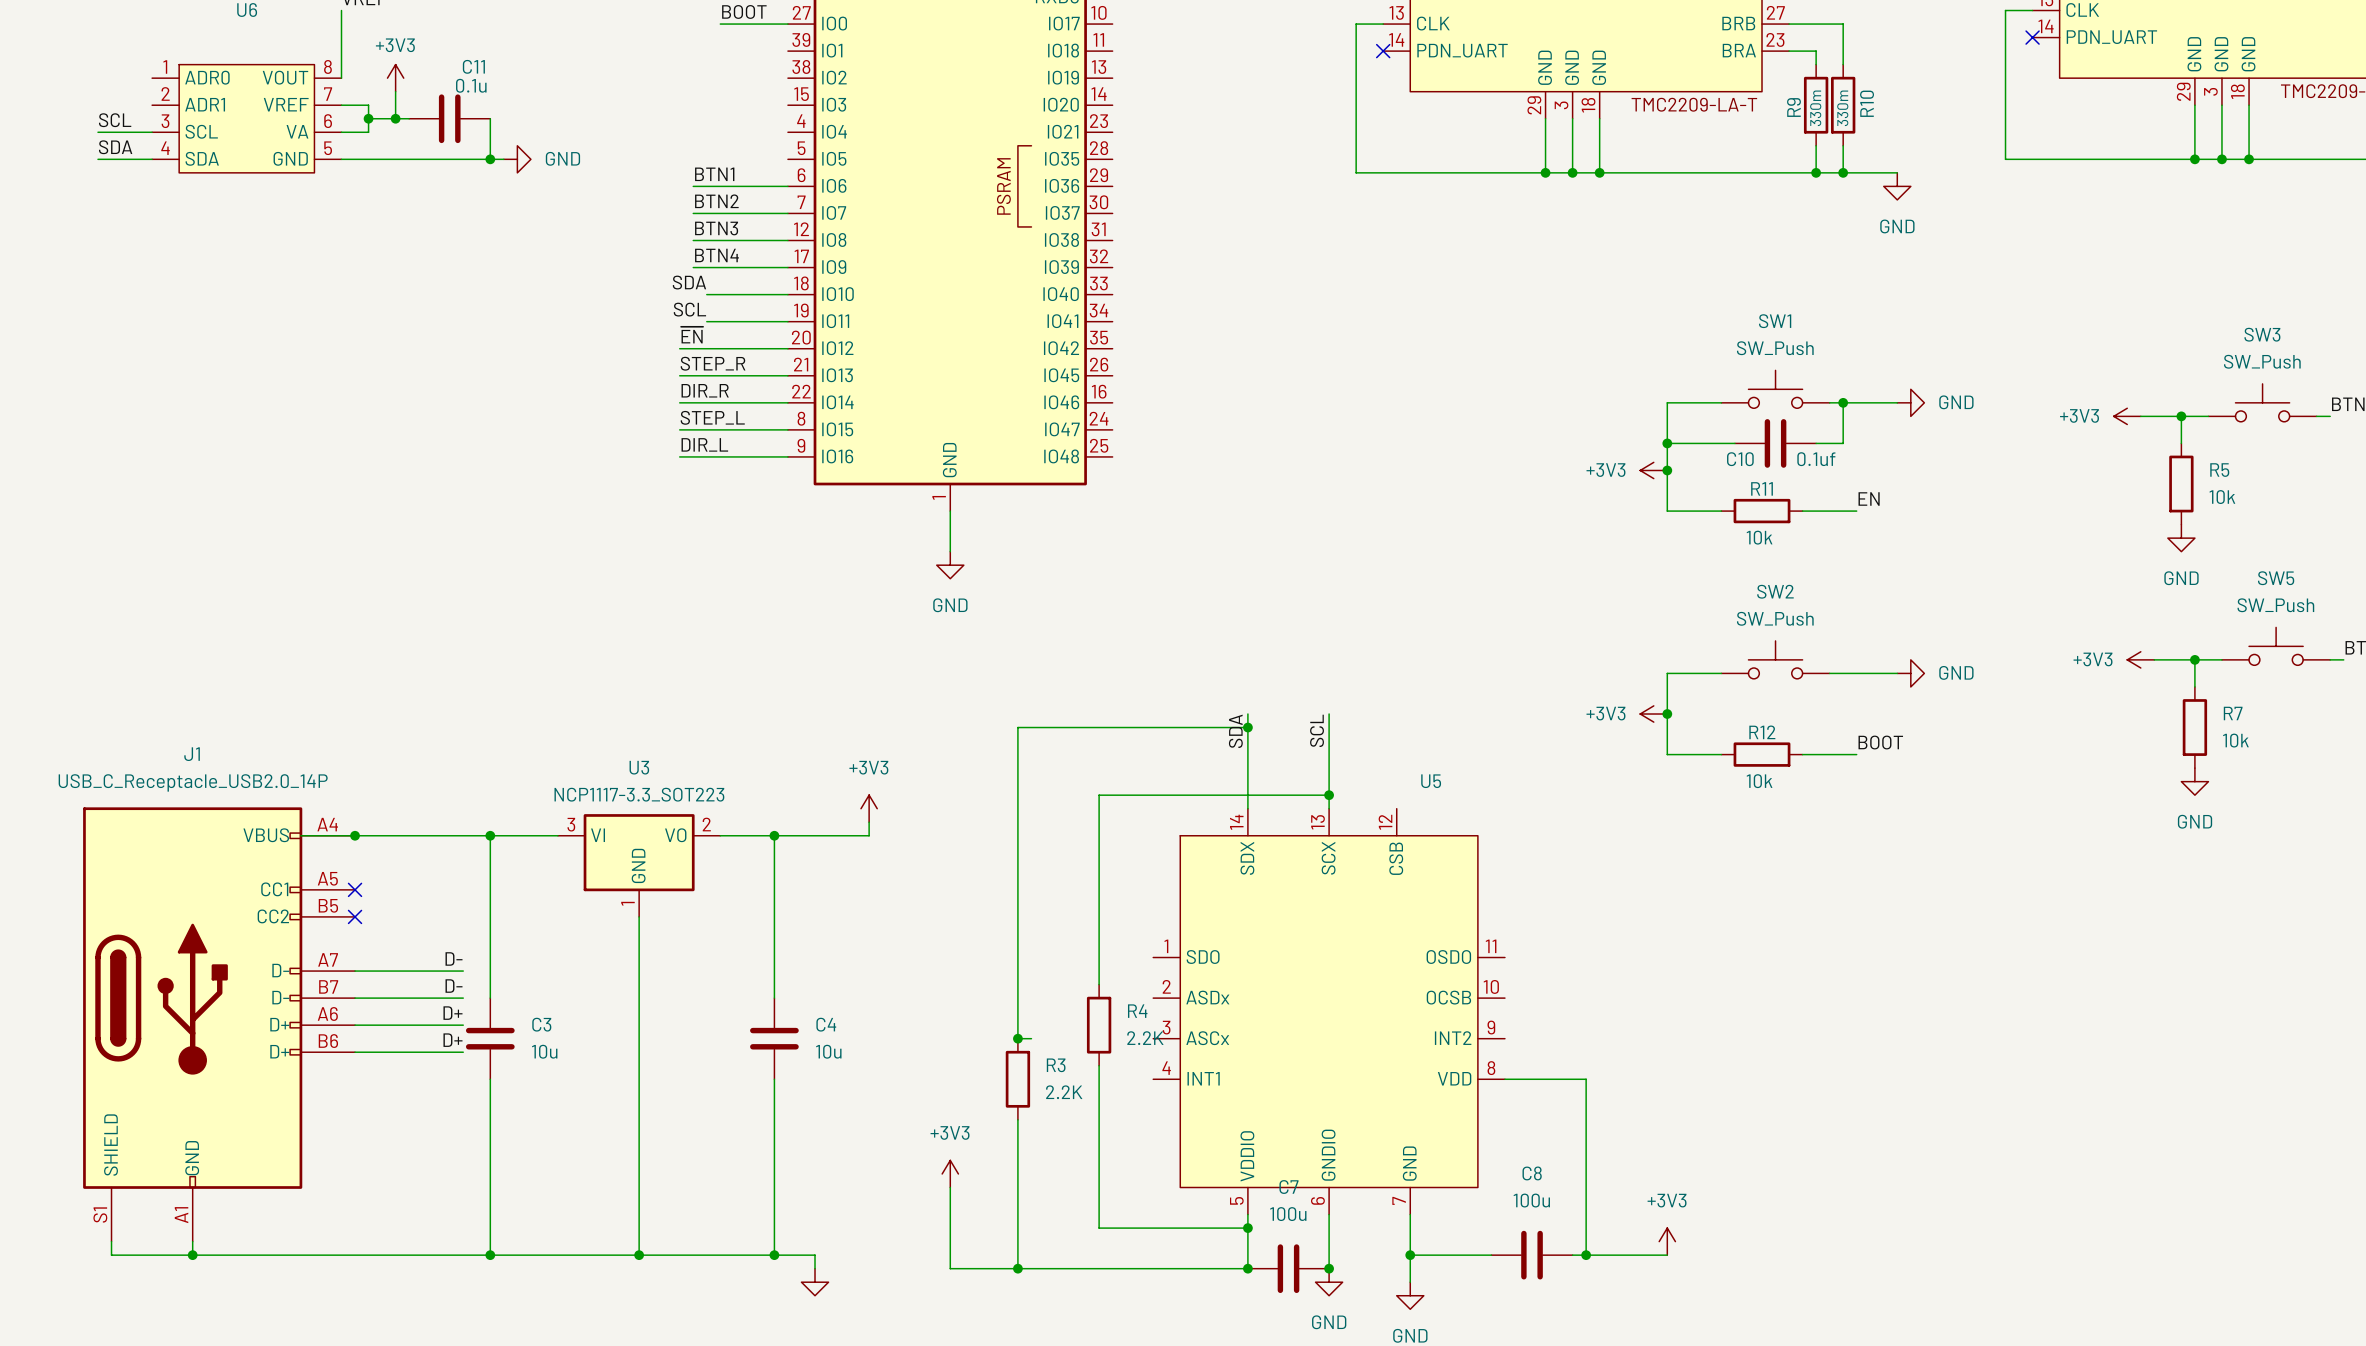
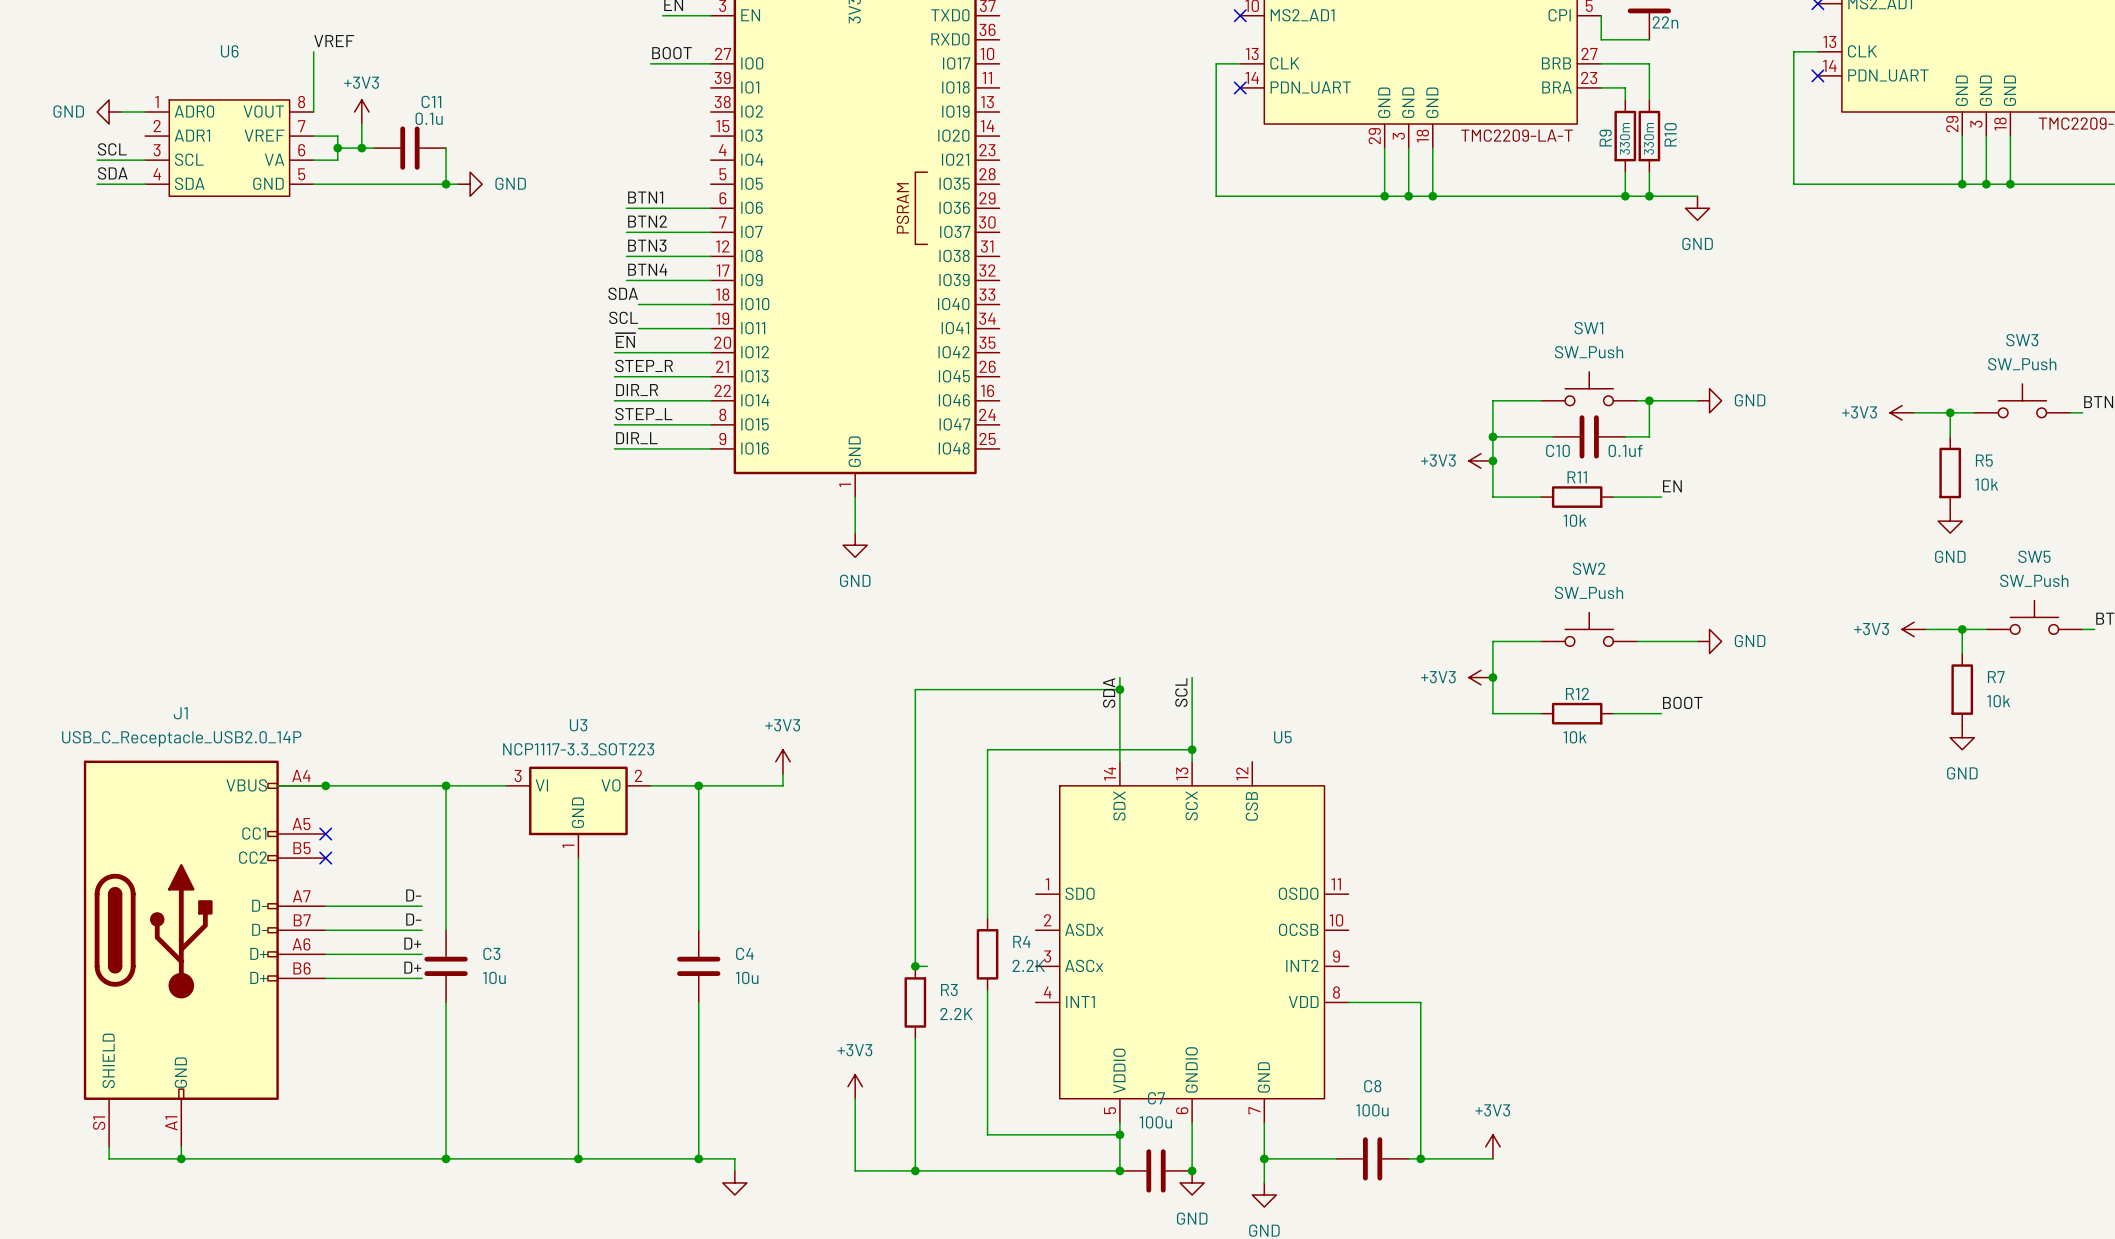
power symbol: none -> GND (109, 112)
wire: none -> (121, 112) (145, 112)

